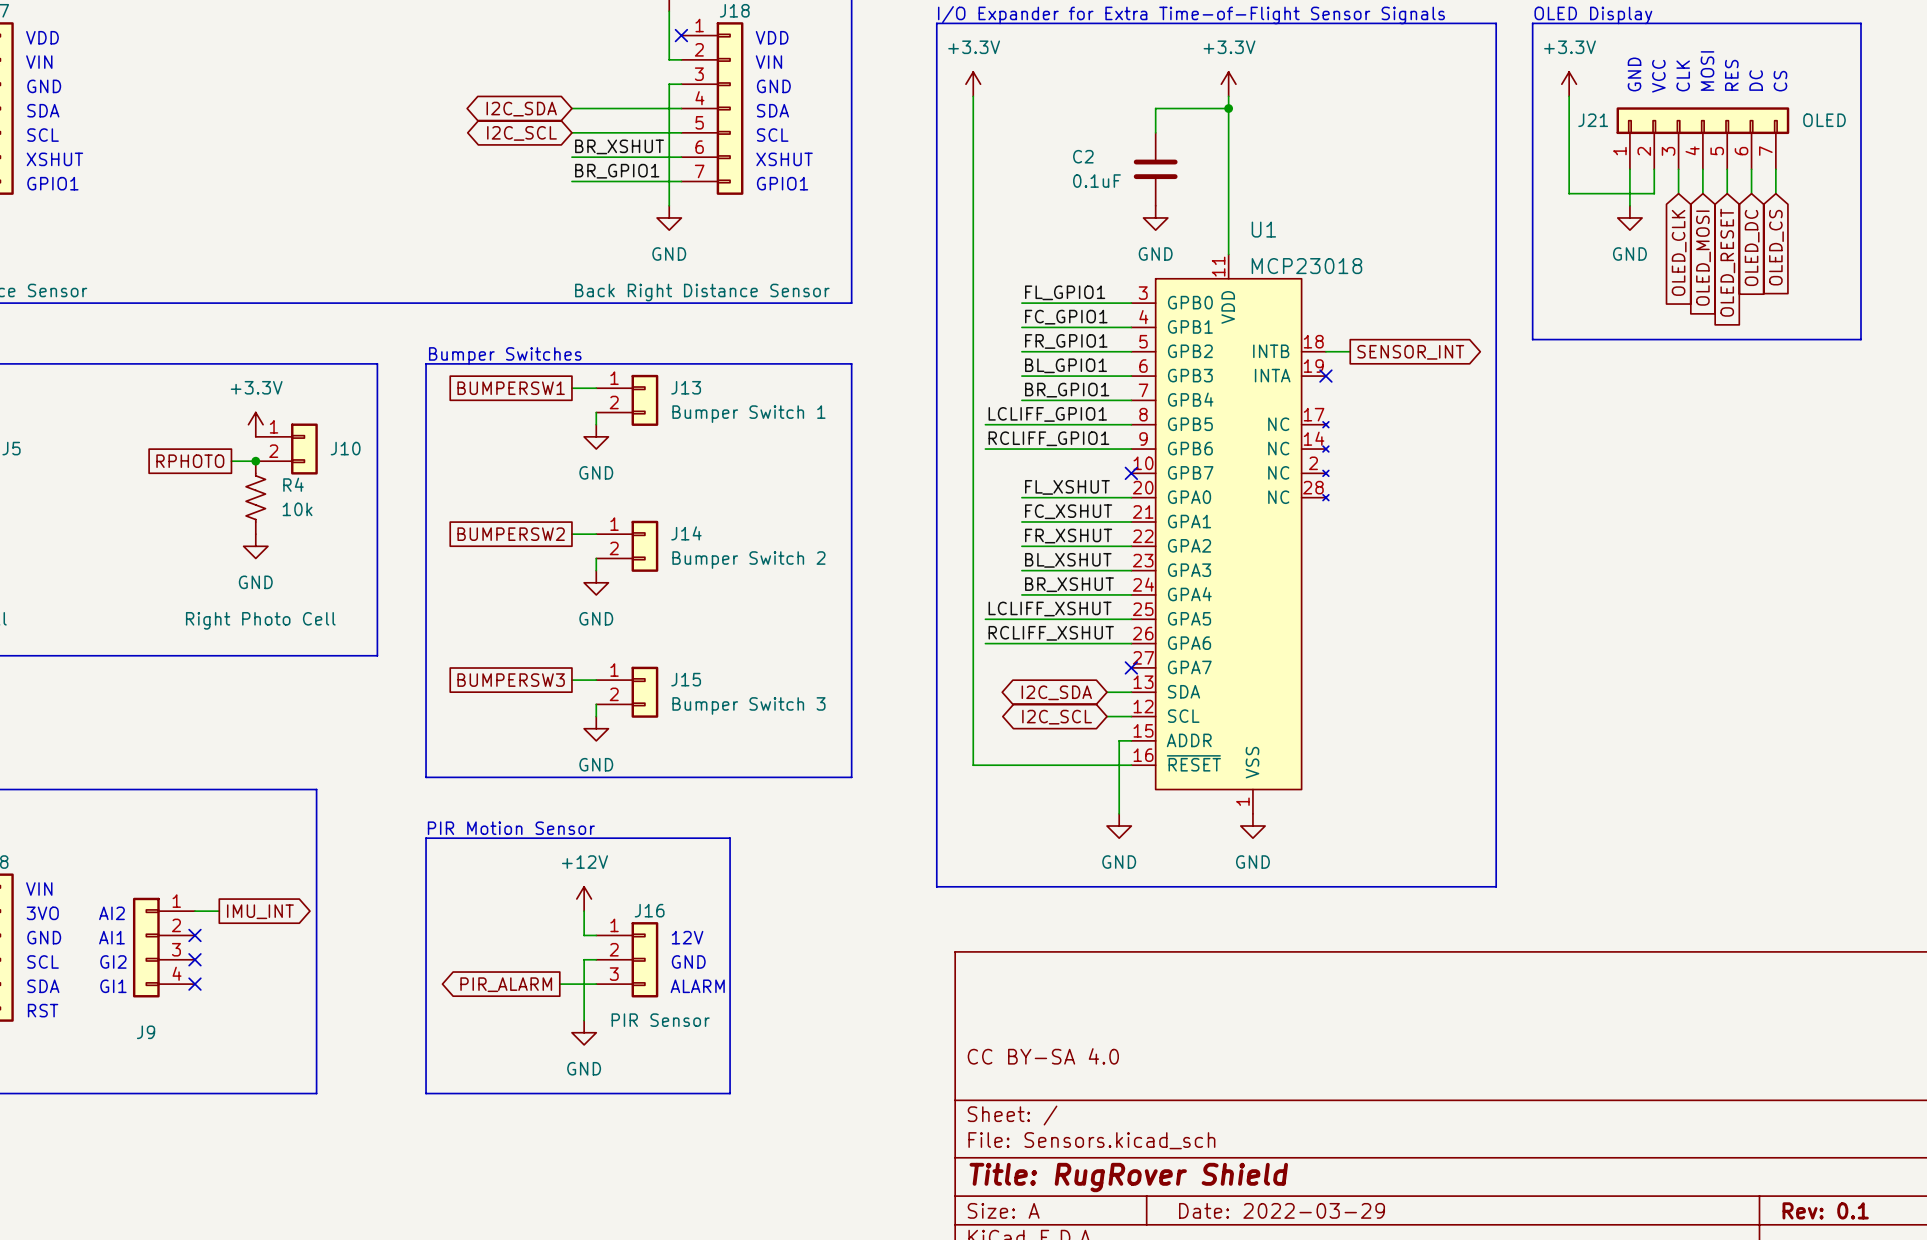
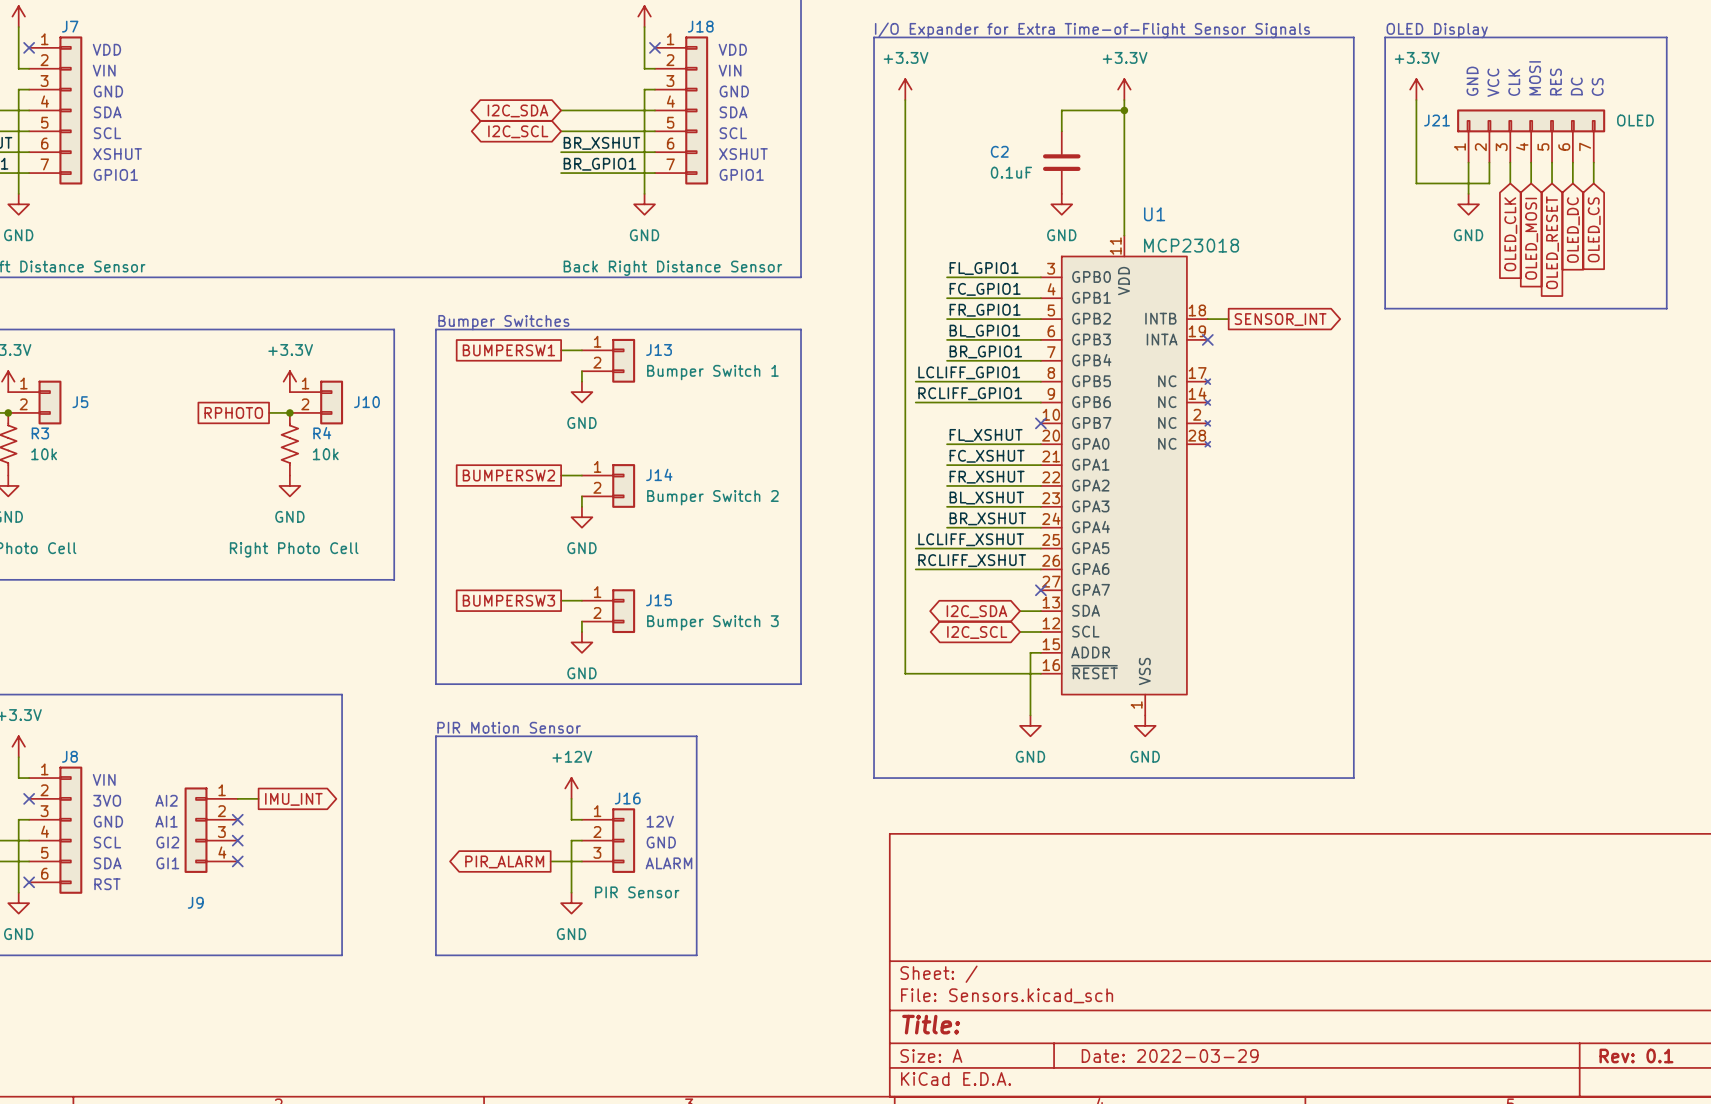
title block: CC BY-SA 4.0 (1043, 1056) -> none
title block: Title: RugRover Shield (1128, 1177) -> Title: (931, 1024)

